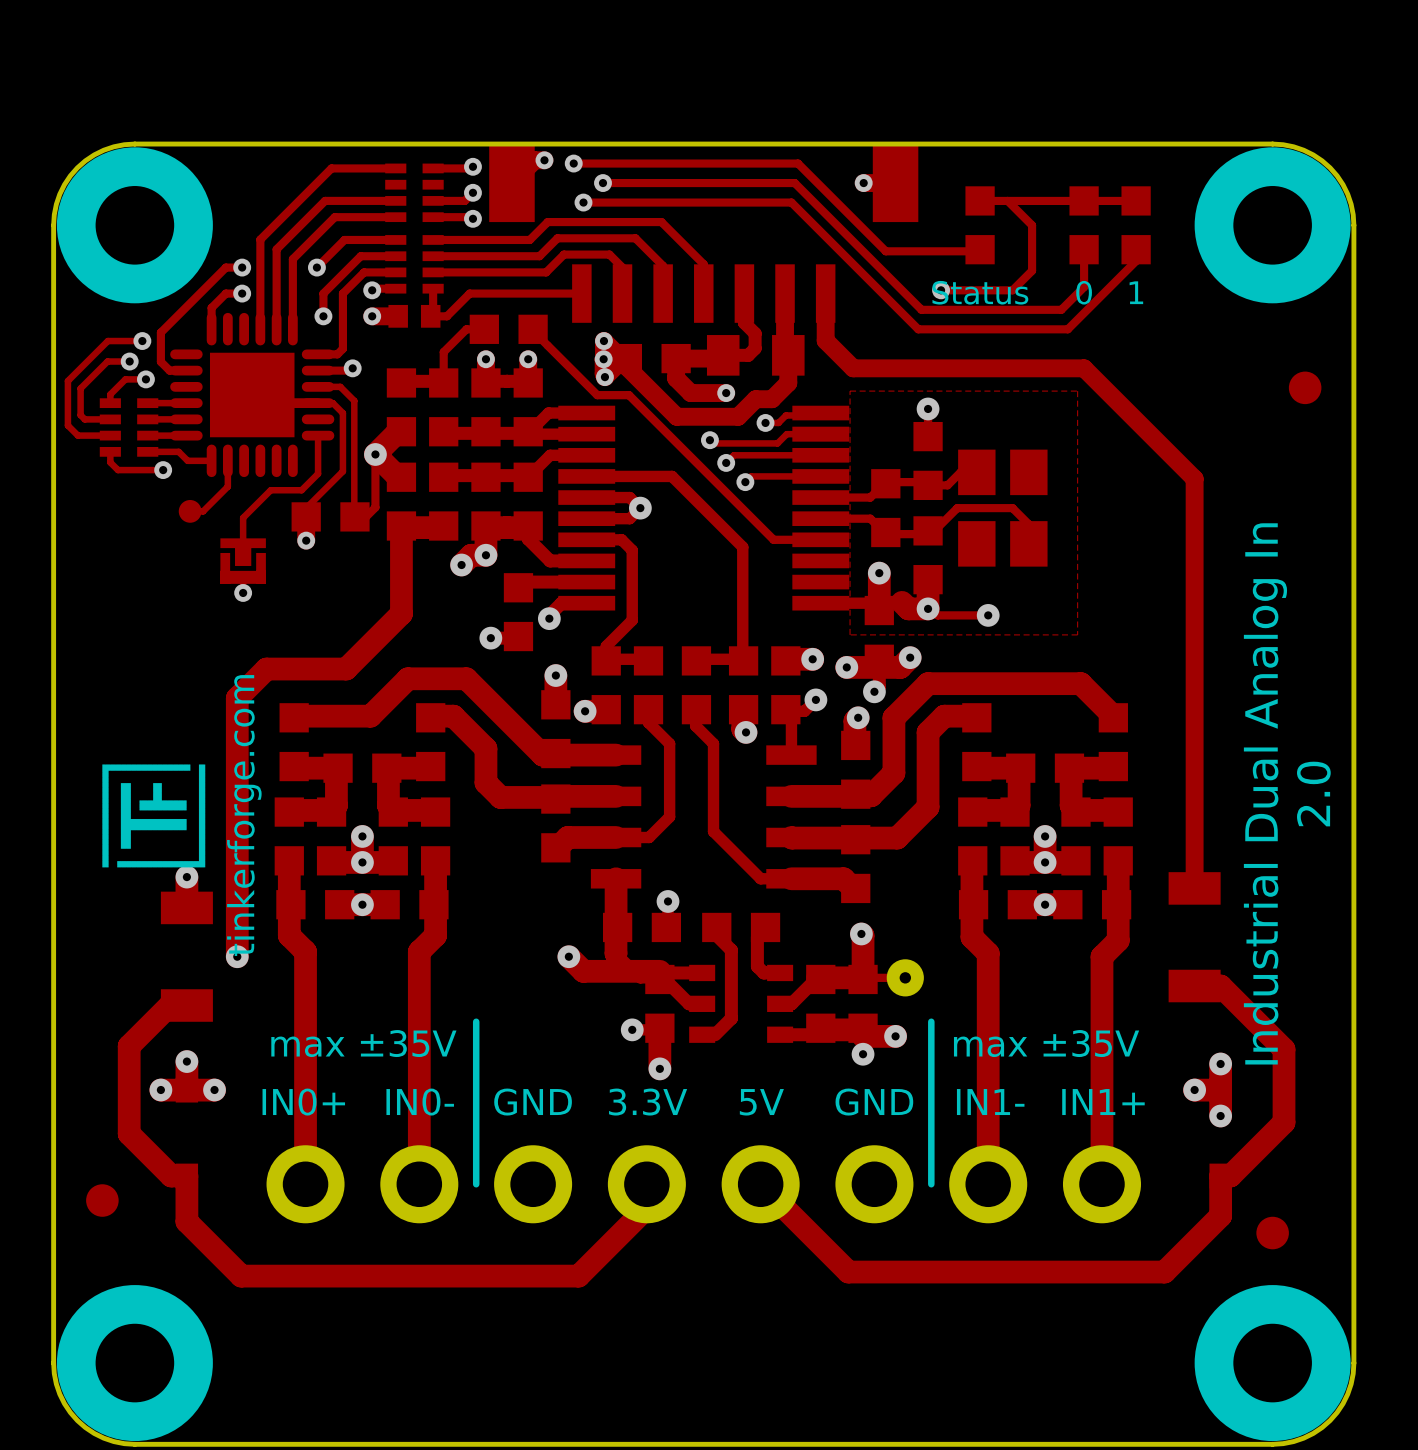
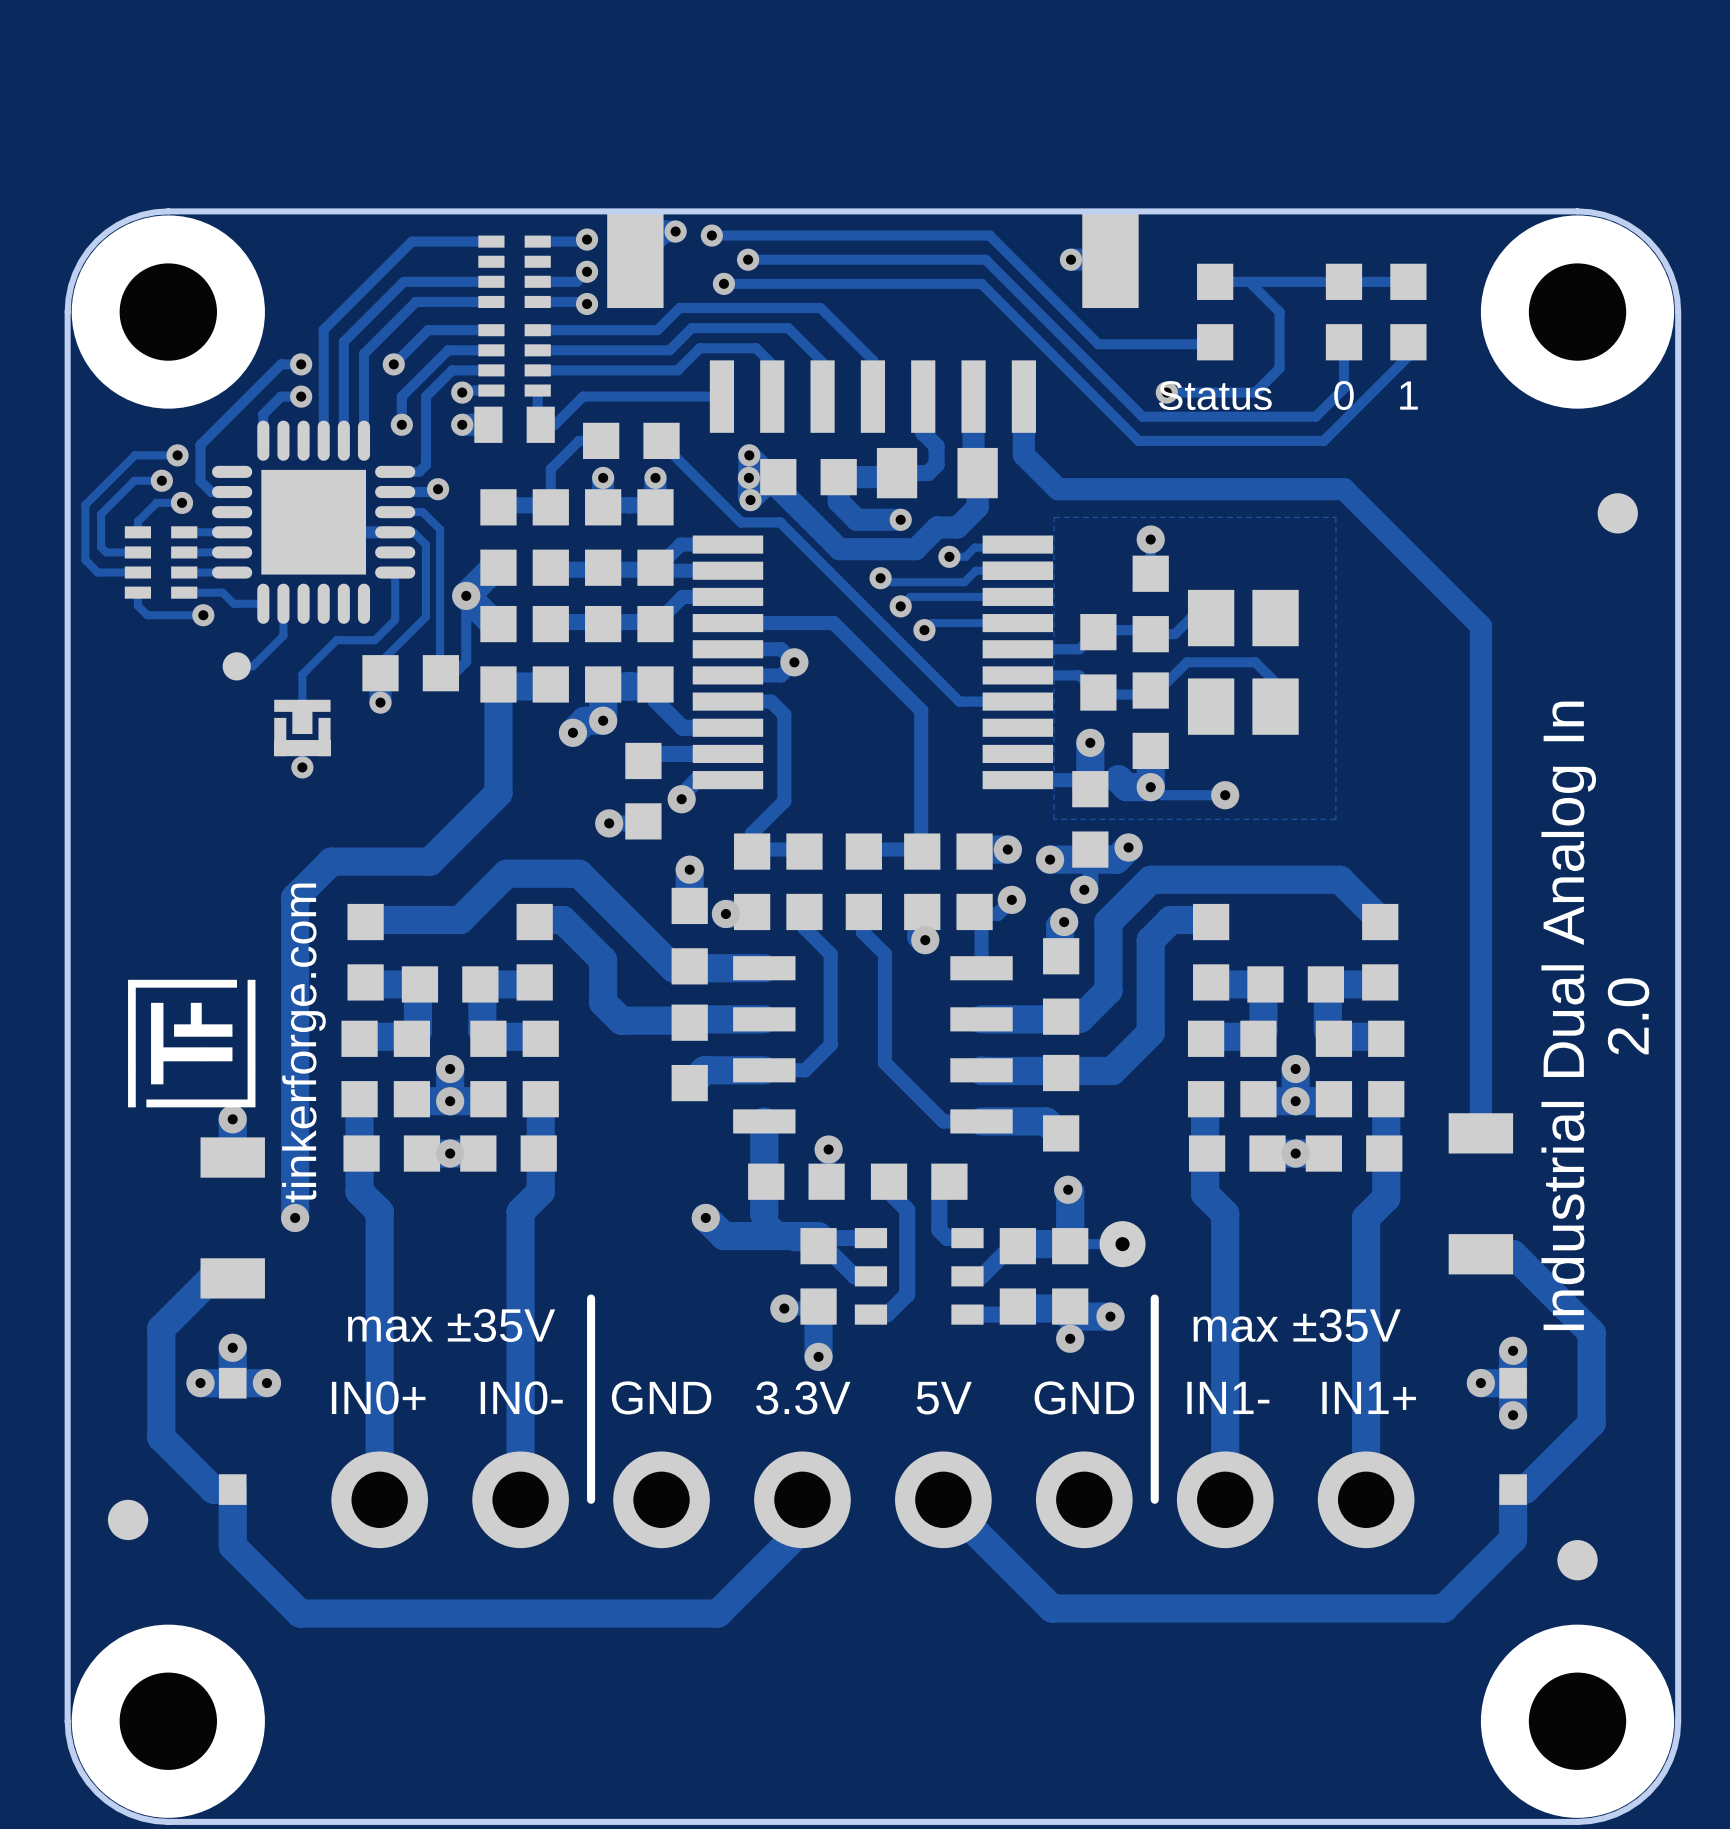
part footprint: [388, 304, 441, 328] -> [474, 406, 555, 443]

